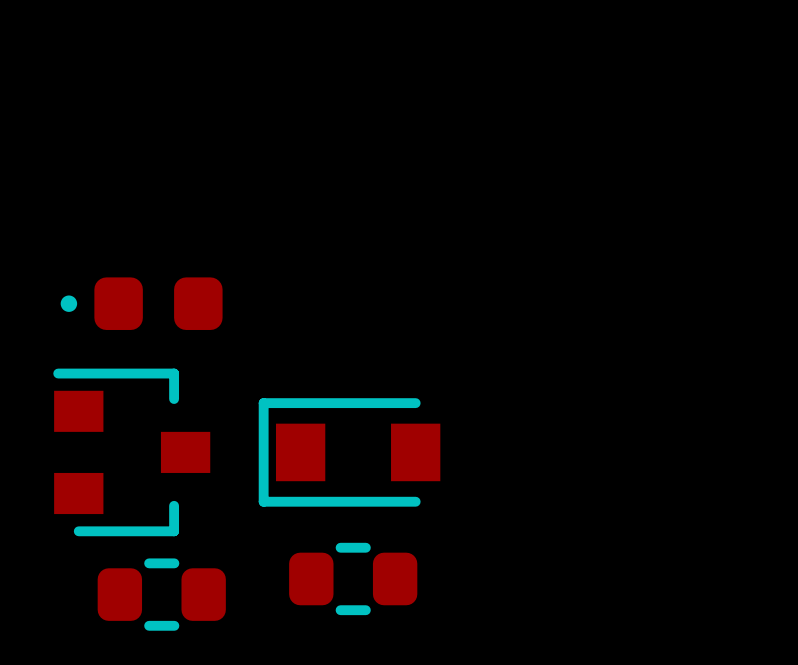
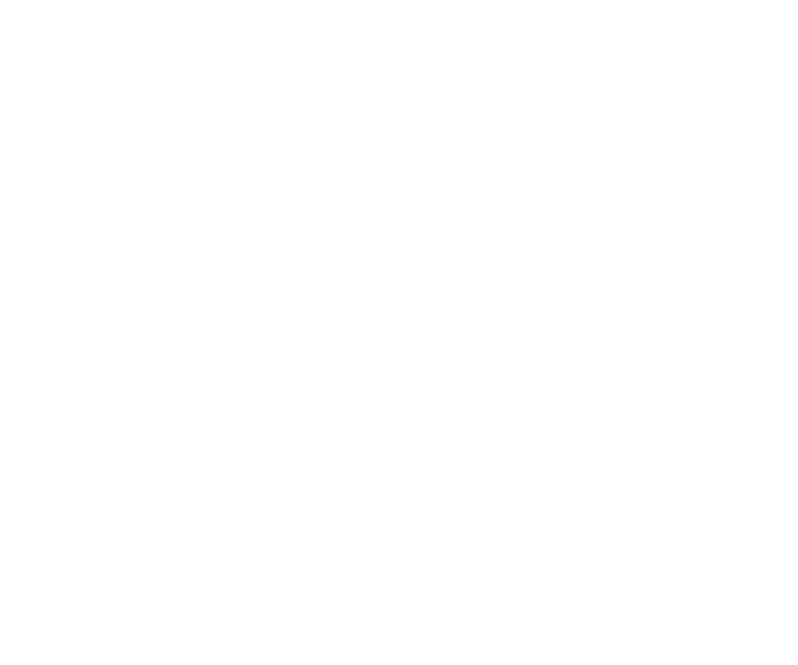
part: (141, 303) -> none
part: (131, 452) -> none
part: (349, 452) -> none
part: (353, 578) -> none
part: (161, 594) -> none

